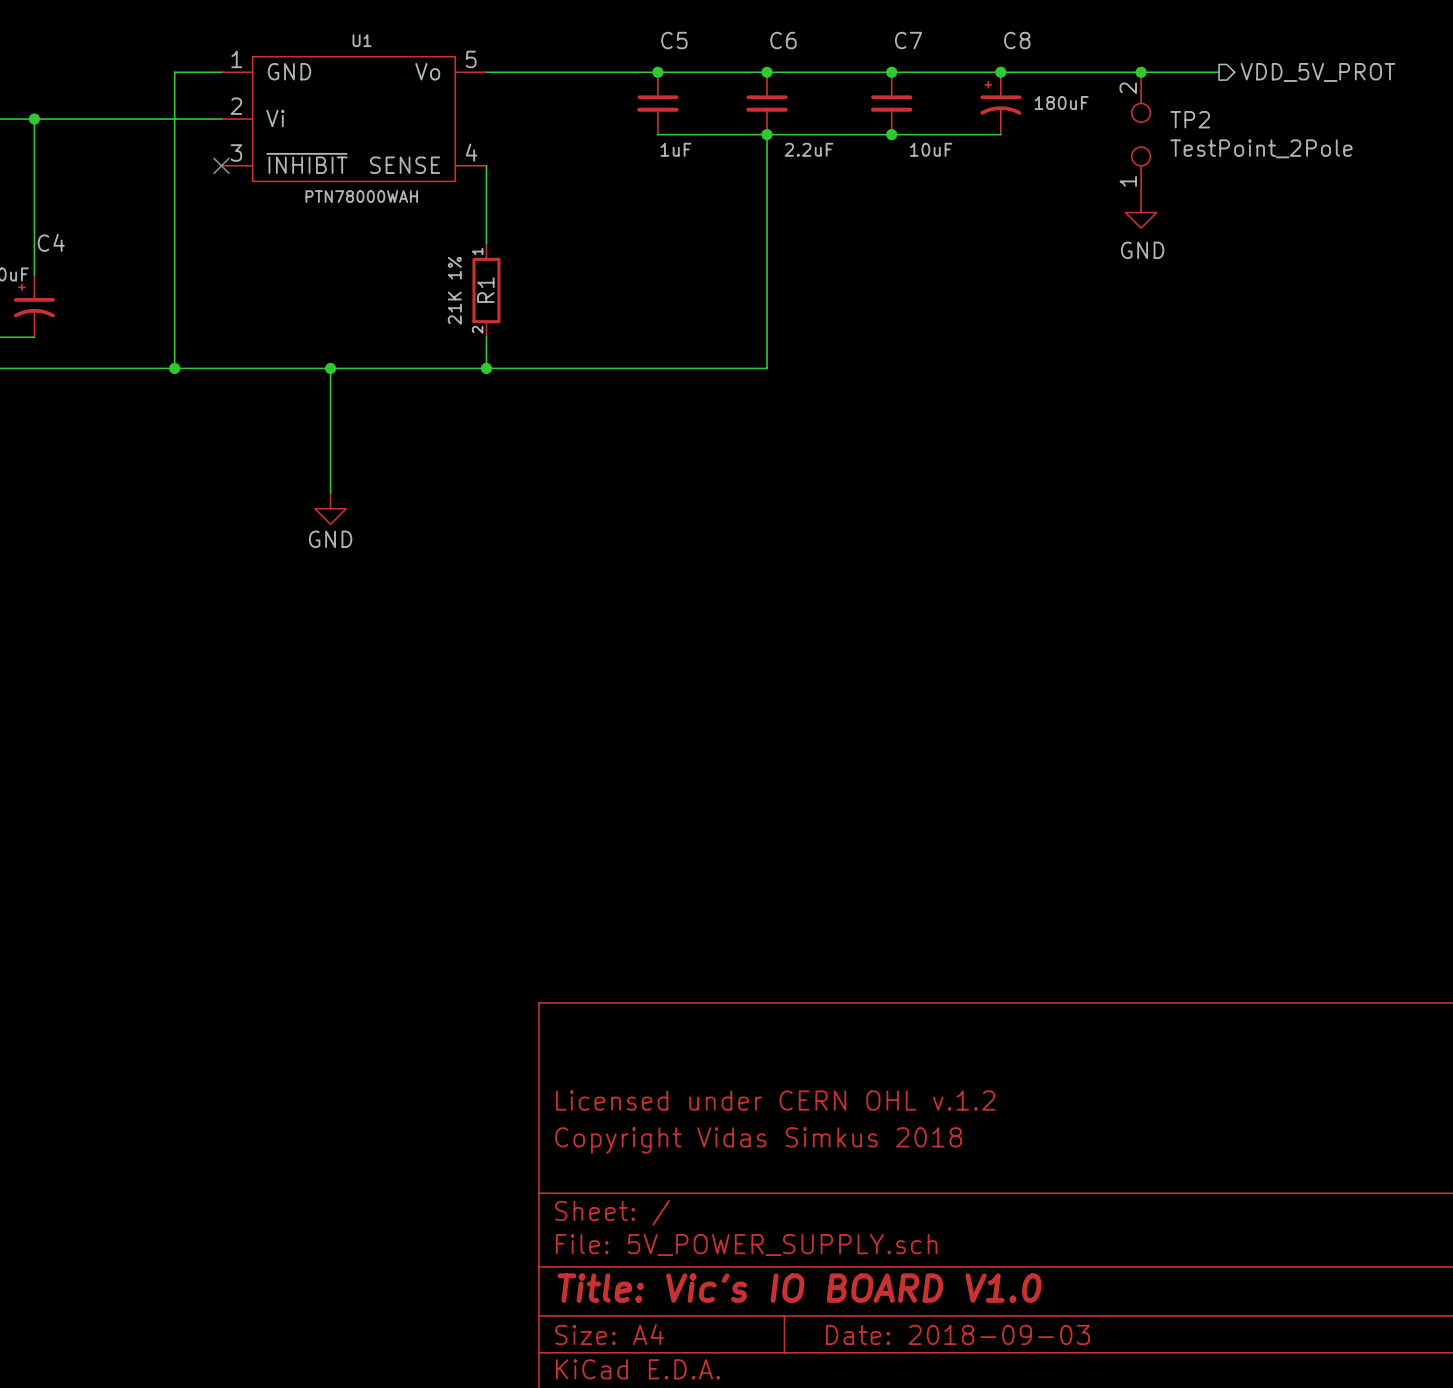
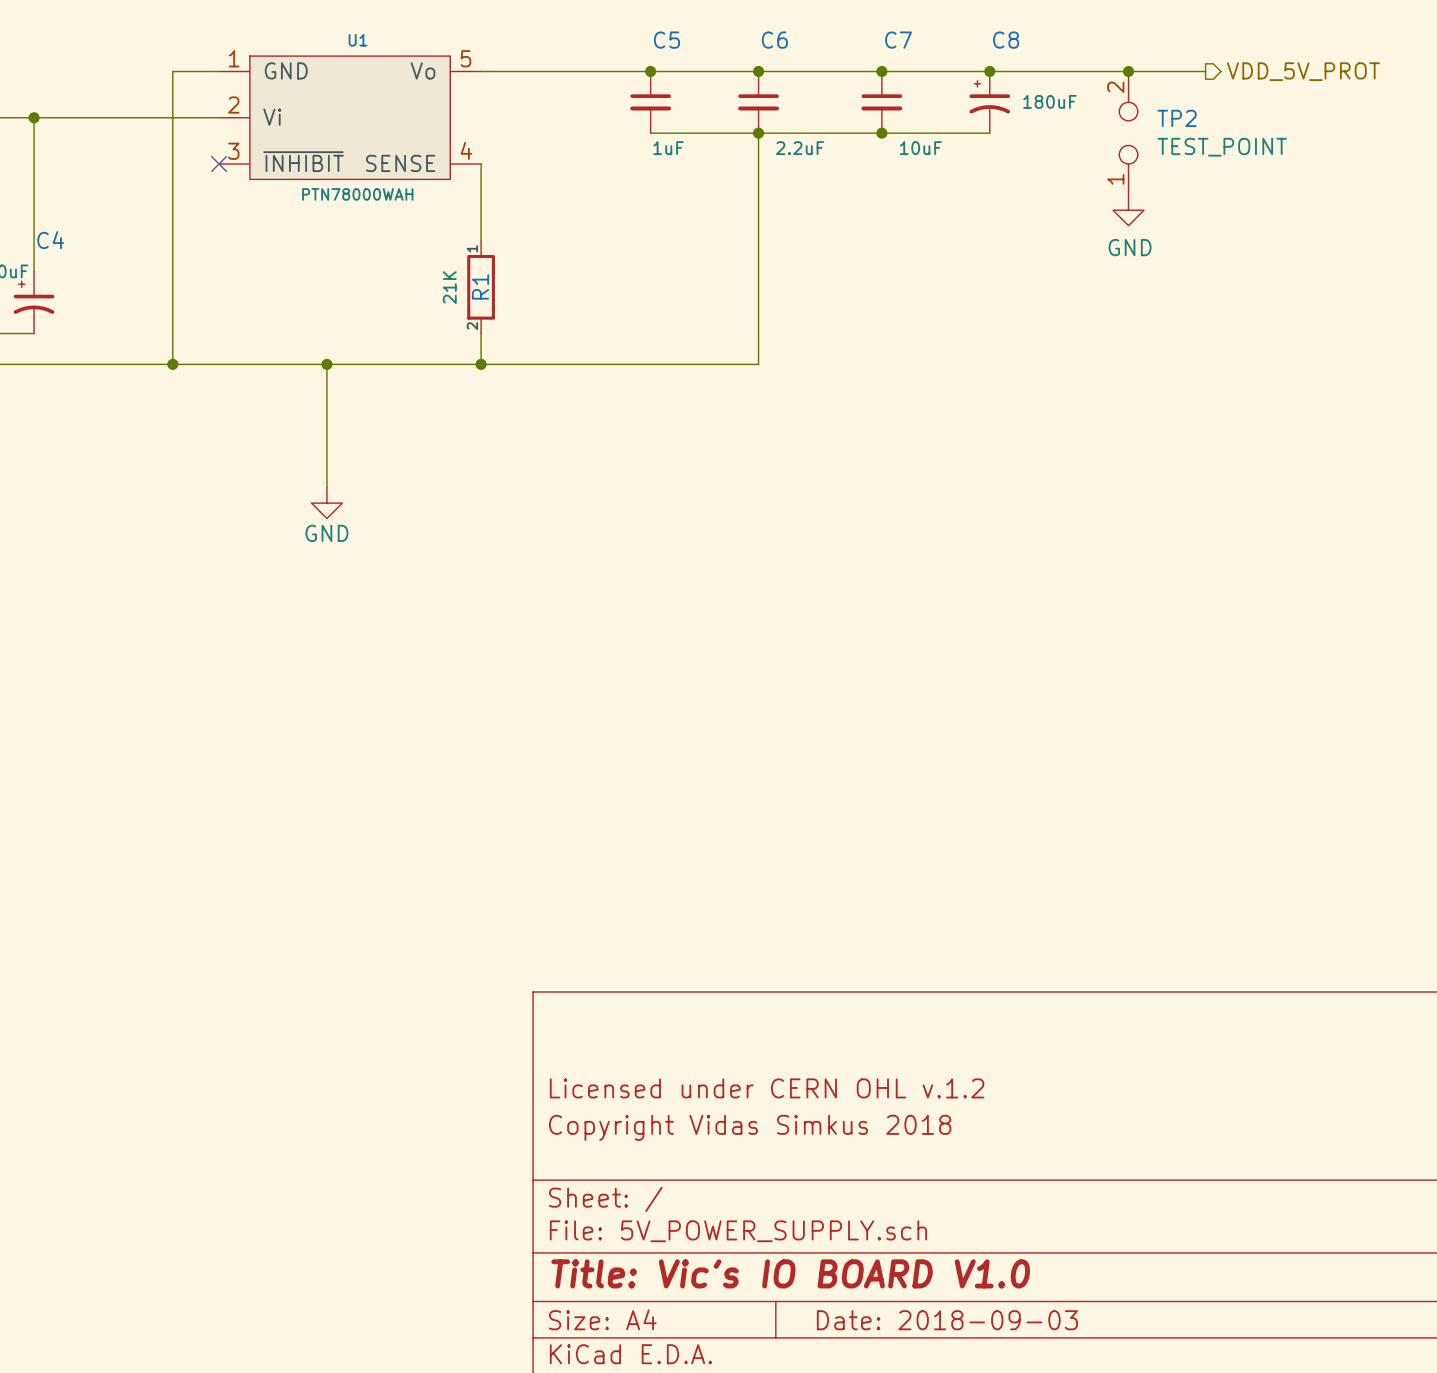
TP2 value: TestPoint_2Pole (1261, 148) -> TEST_POINT (1222, 147)
R1 value: 21K 1% (454, 290) -> 21K (449, 287)

